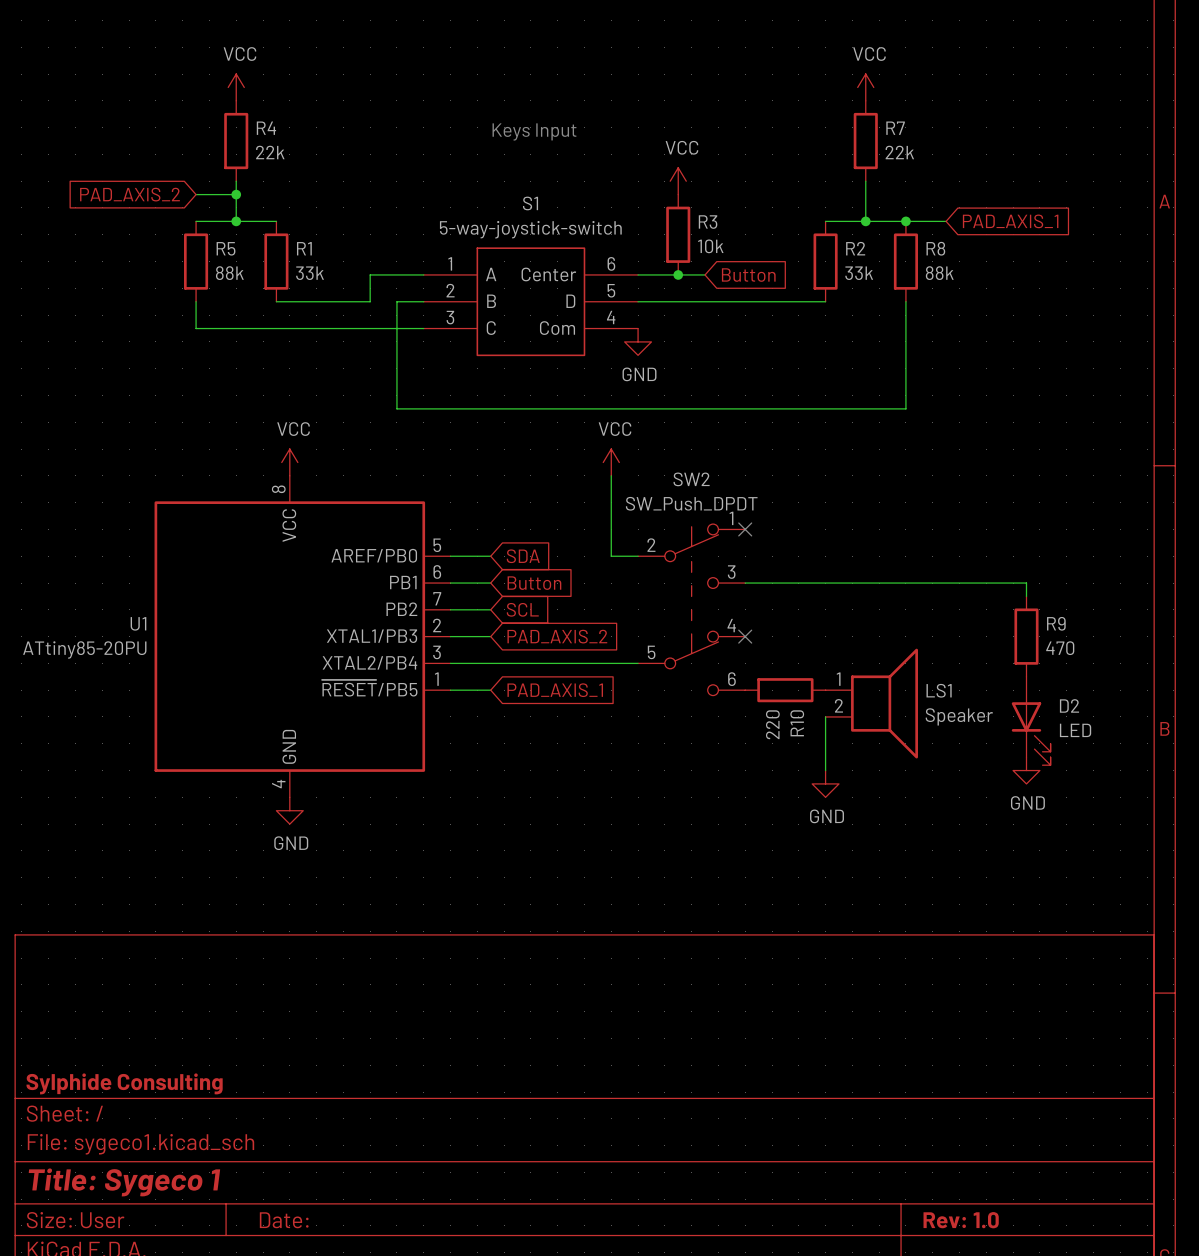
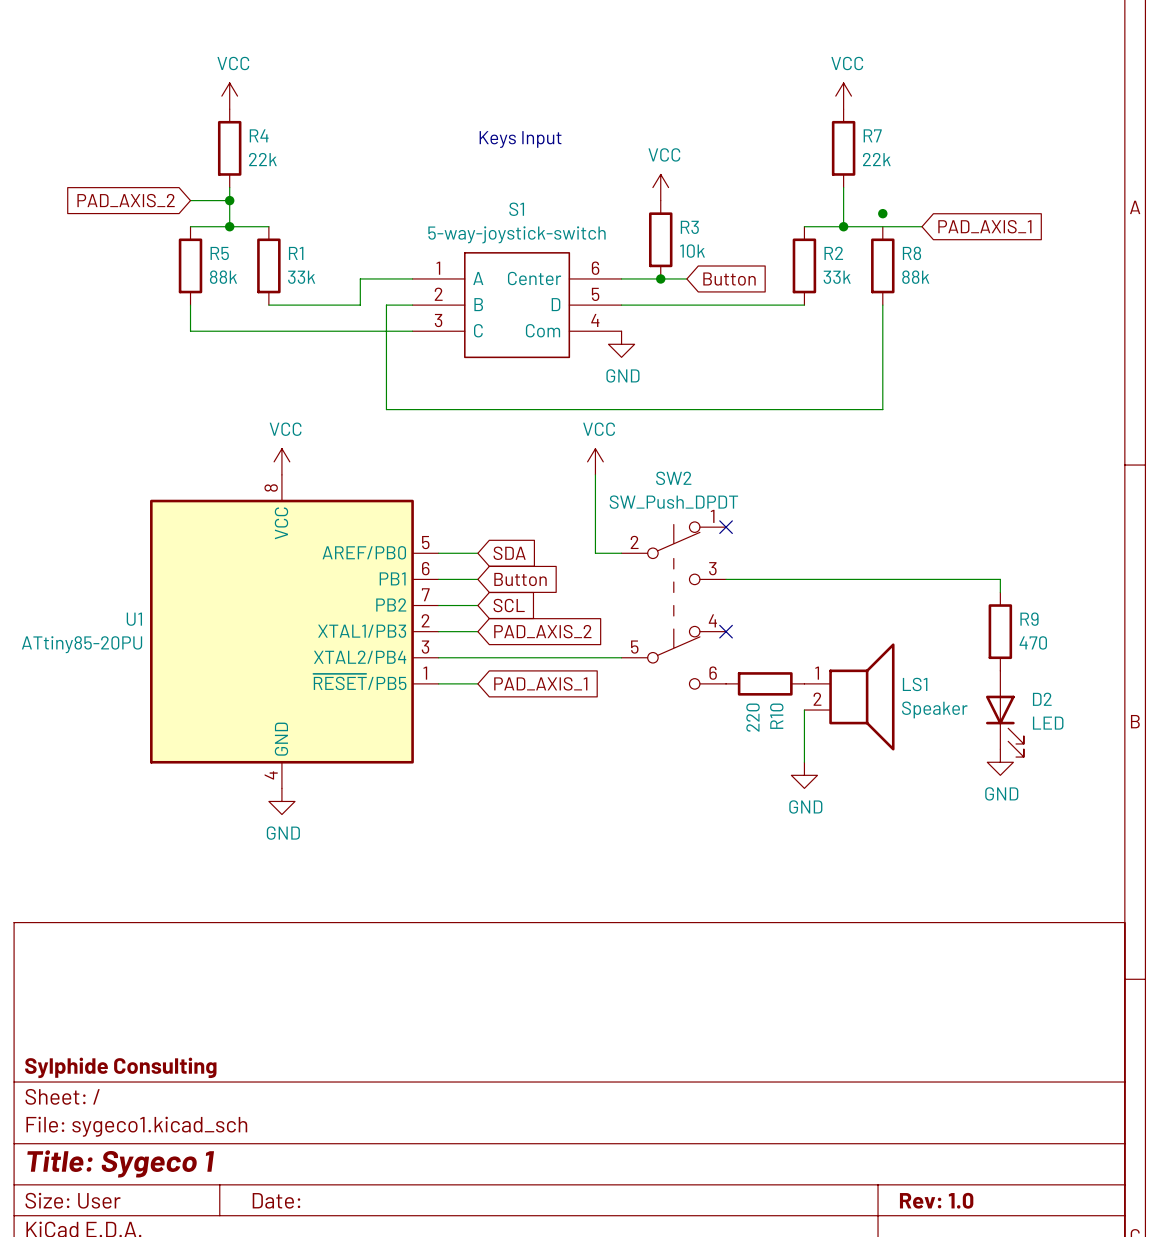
junction position: (905, 221) -> (882, 213)

